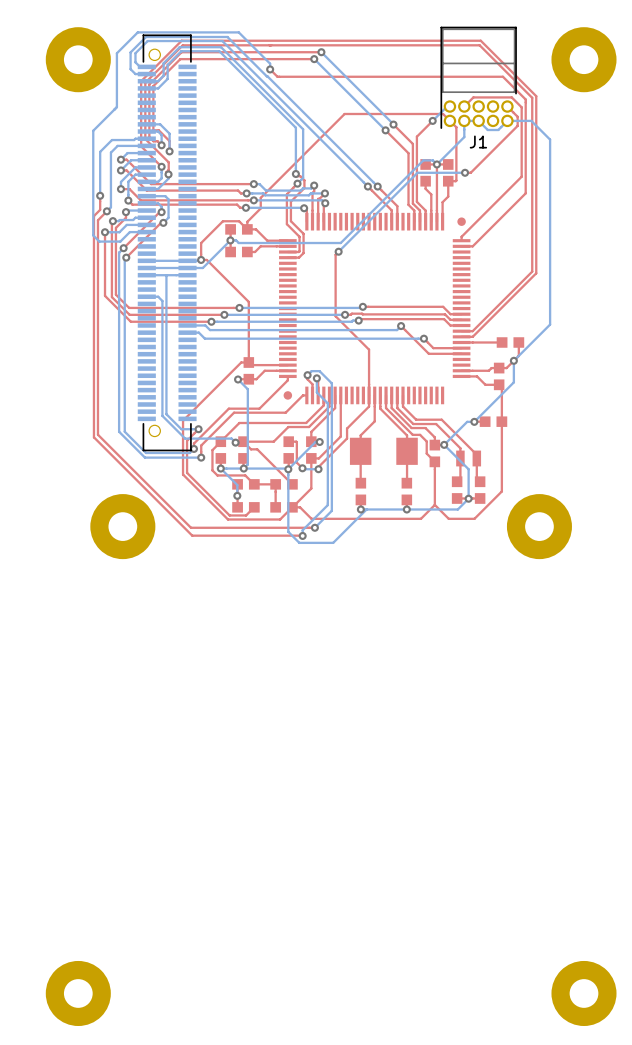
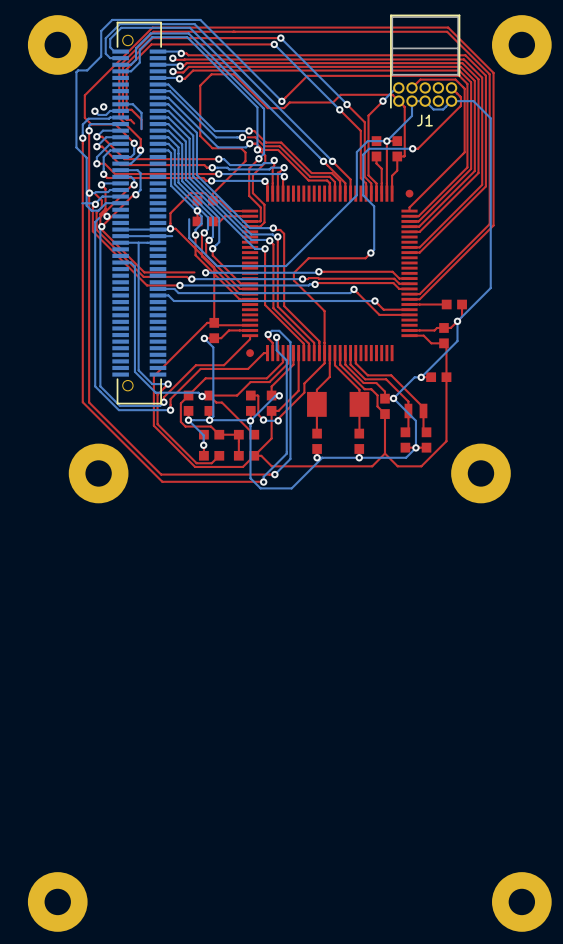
bottom track: (233, 32) (238, 32) (270, 63) (270, 69) -> (200, 19) (281, 101)
top track: (480, 40) (536, 96) (536, 273) -> (427, 27) (448, 27) (493, 72) (493, 225) (478, 241)
bottom track: (125, 44) (116, 53) (116, 107) (93, 130) (93, 235) (99, 241) (120, 241) (130, 232) -> (101, 31) (101, 56) (87, 70) (76, 72) (76, 147) (86, 157) (86, 205) (91, 210) (98, 210) (106, 203)
top track: (479, 45) (532, 97) (532, 271) -> (426, 31) (447, 31) (489, 74) (489, 224) (474, 239)
bottom track: none -> (157, 51) (179, 51) (181, 53)
top track: none -> (181, 53) (188, 55) (465, 55) (485, 75) (485, 186) (419, 252) (409, 252)
via: none -> (181, 53)
top track: (270, 69) (277, 76) (502, 76) (525, 99) (525, 193) (471, 246) -> (281, 101) (307, 75) (459, 75) (467, 83) (467, 167) (418, 216)
via: (270, 69) -> none
top track: none -> (172, 58) (463, 59) (482, 77) (482, 184) (419, 247) (409, 247)
via: none -> (172, 58)
top track: (141, 81) (141, 146) -> (115, 64) (84, 95) (84, 117) (91, 124) (115, 124)
bottom track: none -> (157, 64) (180, 66)
top track: none -> (180, 66) (186, 63) (462, 63) (478, 79) (478, 173) (419, 231) (409, 231)
via: none -> (180, 66)
top track: none -> (173, 71) (183, 72) (188, 66) (460, 66) (474, 80) (474, 171) (419, 226) (409, 226)
via: none -> (173, 71)
bottom track: none -> (157, 77) (179, 78)
top track: none -> (179, 78) (184, 78) (193, 70) (459, 70) (471, 82) (471, 168) (418, 221) (409, 221)
via: none -> (179, 78)
bottom track: none -> (157, 84) (168, 84) (214, 131) (248, 131)
bottom track: none -> (157, 91) (169, 91) (216, 137) (242, 137)
top track: (386, 113) (344, 113) (260, 197) (260, 208) -> (340, 94) (333, 102) (289, 102) (284, 108) (267, 108) (234, 74) (211, 74) (200, 85) (200, 135) (212, 148) (241, 148) (245, 152) (245, 161) (225, 181)
bottom track: none -> (157, 97) (168, 97) (218, 147) (246, 147) (249, 143)
via: none -> (281, 101)
bottom track: none -> (157, 104) (168, 104) (196, 132) (196, 175) (250, 228) (273, 228)
via: none -> (103, 106)
via: none -> (94, 111)
bottom track: (146, 131) (158, 131) (161, 134) (161, 145) -> (120, 110) (110, 110) (106, 114) (98, 114) (94, 111)
bottom track: none -> (157, 110) (168, 110) (193, 135) (193, 176) (251, 234) (272, 234) (277, 236)
bottom track: none -> (157, 117) (168, 117) (189, 138) (189, 178) (251, 239) (269, 240)
bottom track: (117, 145) (110, 152) (110, 207) (106, 211) -> (93, 124) (89, 125) (89, 130)
via: (161, 145) -> none
bottom track: none -> (157, 124) (168, 124) (185, 141) (185, 179) (255, 248) (264, 248)
bottom track: (105, 146) (100, 151) (100, 195) -> (82, 124) (82, 138)
via: (169, 151) -> none
via: none -> (89, 130)
bottom track: none -> (157, 130) (168, 130) (182, 144) (182, 181) (219, 218) (219, 242) (212, 248)
top track: none -> (249, 130) (254, 130) (265, 142) (281, 142) (311, 173) (331, 173) (340, 181) (340, 193)
via: none -> (249, 130)
bottom track: none -> (157, 137) (168, 137) (178, 147) (178, 182) (212, 217) (212, 236) (209, 240)
via: none -> (242, 137)
top track: none -> (247, 137) (255, 137) (264, 146) (279, 146) (310, 176) (329, 176) (334, 182) (334, 193)
via: none -> (82, 138)
bottom track: (436, 164) (432, 160) (423, 160) (340, 243) (238, 243) (236, 240) (230, 240) (202, 268) -> (386, 141) (367, 141) (356, 152) (356, 195) (286, 266) (217, 266) (189, 238) (189, 219)
bottom track: none -> (157, 143) (168, 143) (174, 150) (174, 184) (207, 217) (207, 229) (204, 232)
top track: none -> (249, 143) (256, 143) (262, 149) (278, 149) (308, 180) (327, 180) (329, 183) (329, 193)
via: none -> (249, 143)
bottom track: none -> (157, 150) (168, 150) (171, 153) (171, 185) (201, 216) (201, 223) (195, 229) (195, 235)
bottom track: (411, 179) (338, 251) -> (363, 154) (363, 195) (374, 206) (374, 249) (370, 253)
top track: (100, 195) (100, 209) (93, 216) (93, 437) (105, 448) -> (82, 138) (82, 402)
via: (100, 195) -> none
top track: (106, 211) (97, 220) (97, 434) (112, 449) -> (89, 130) (89, 402)
via: (106, 211) -> none
top track: (125, 212) (125, 217) (115, 227) (115, 294) (129, 307) (239, 307) -> (101, 184) (105, 188) (105, 208) (100, 214) (100, 228) (144, 272) (194, 272)
top track: (112, 221) (111, 297) (129, 314) (224, 314) -> none
top track: none -> (95, 194) (101, 200) (101, 207) (96, 212) (96, 229) (143, 276) (187, 276) (190, 280)
top track: (105, 232) (105, 295) (130, 321) (175, 321) -> (95, 204) (92, 206) (92, 231) (146, 285)
via: (105, 232) -> none
via: none -> (95, 204)
via: none -> (107, 216)
via: (123, 248) -> none
top track: (338, 251) (335, 254) (335, 308) -> (370, 253) (365, 258) (308, 258) (293, 272)
via: (338, 251) -> none
via: none -> (273, 228)
top track: none -> (273, 229) (280, 229) (284, 233) (284, 306) (319, 341) (319, 353)
top track: none -> (204, 232) (201, 235) (201, 256) (239, 294) (250, 294)
via: none -> (204, 232)
top track: none -> (195, 235) (195, 255) (239, 299) (250, 299)
via: none -> (195, 235)
top track: none -> (277, 236) (277, 306) (314, 342) (314, 353)
via: none -> (277, 236)
top track: none -> (209, 240) (206, 243) (206, 255) (239, 288) (250, 288)
via: none -> (209, 240)
top track: none -> (269, 240) (273, 244) (273, 308) (309, 343) (309, 353)
via: none -> (269, 240)
top track: none -> (212, 248) (212, 255) (240, 283) (250, 283)
via: none -> (212, 248)
top track: none -> (265, 248) (265, 260)
via: none -> (265, 248)
via: none -> (370, 253)
top track: none -> (265, 260) (265, 304) (303, 343) (303, 353)

